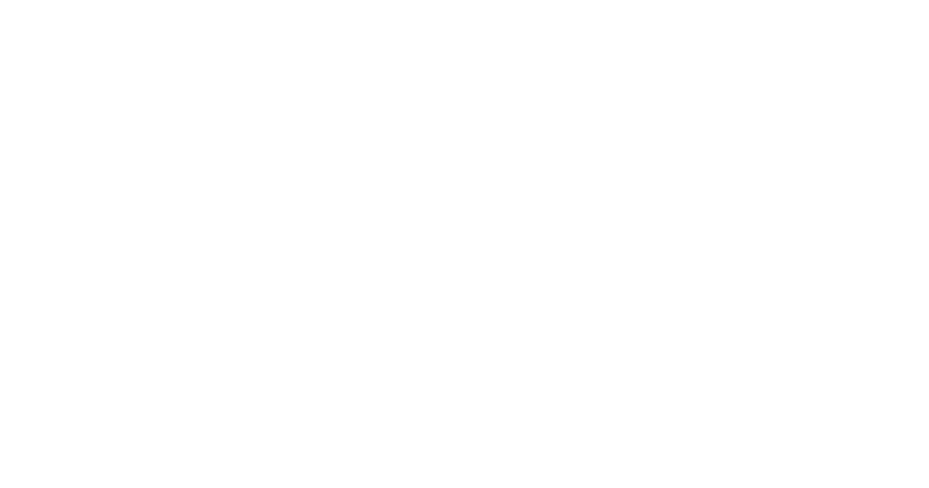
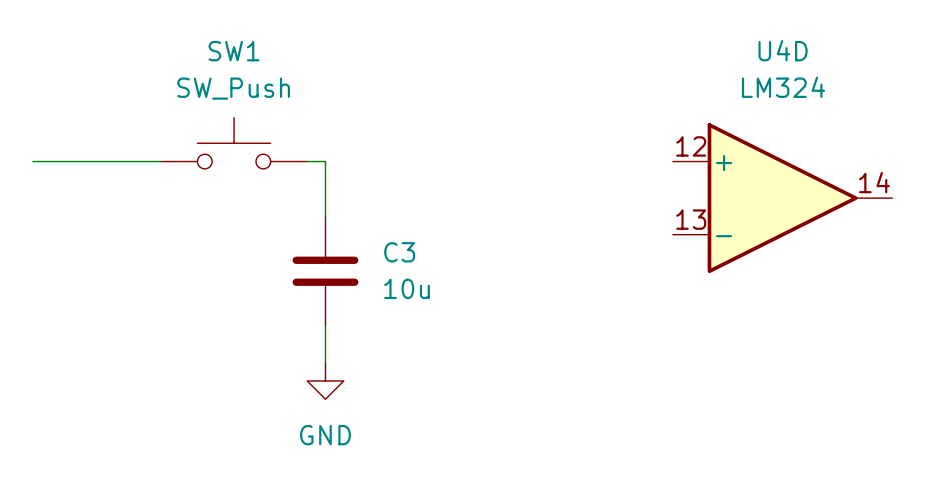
SW1: none -> SW_Push (234, 143)
wire: none -> (32, 161) (160, 161)
wire: none -> (307, 161) (325, 161) (325, 216)
U4D: none -> LM324 (782, 198)
C3: none -> 10u (325, 271)
wire: none -> (325, 326) (325, 362)
power symbol: none -> GND (325, 380)

